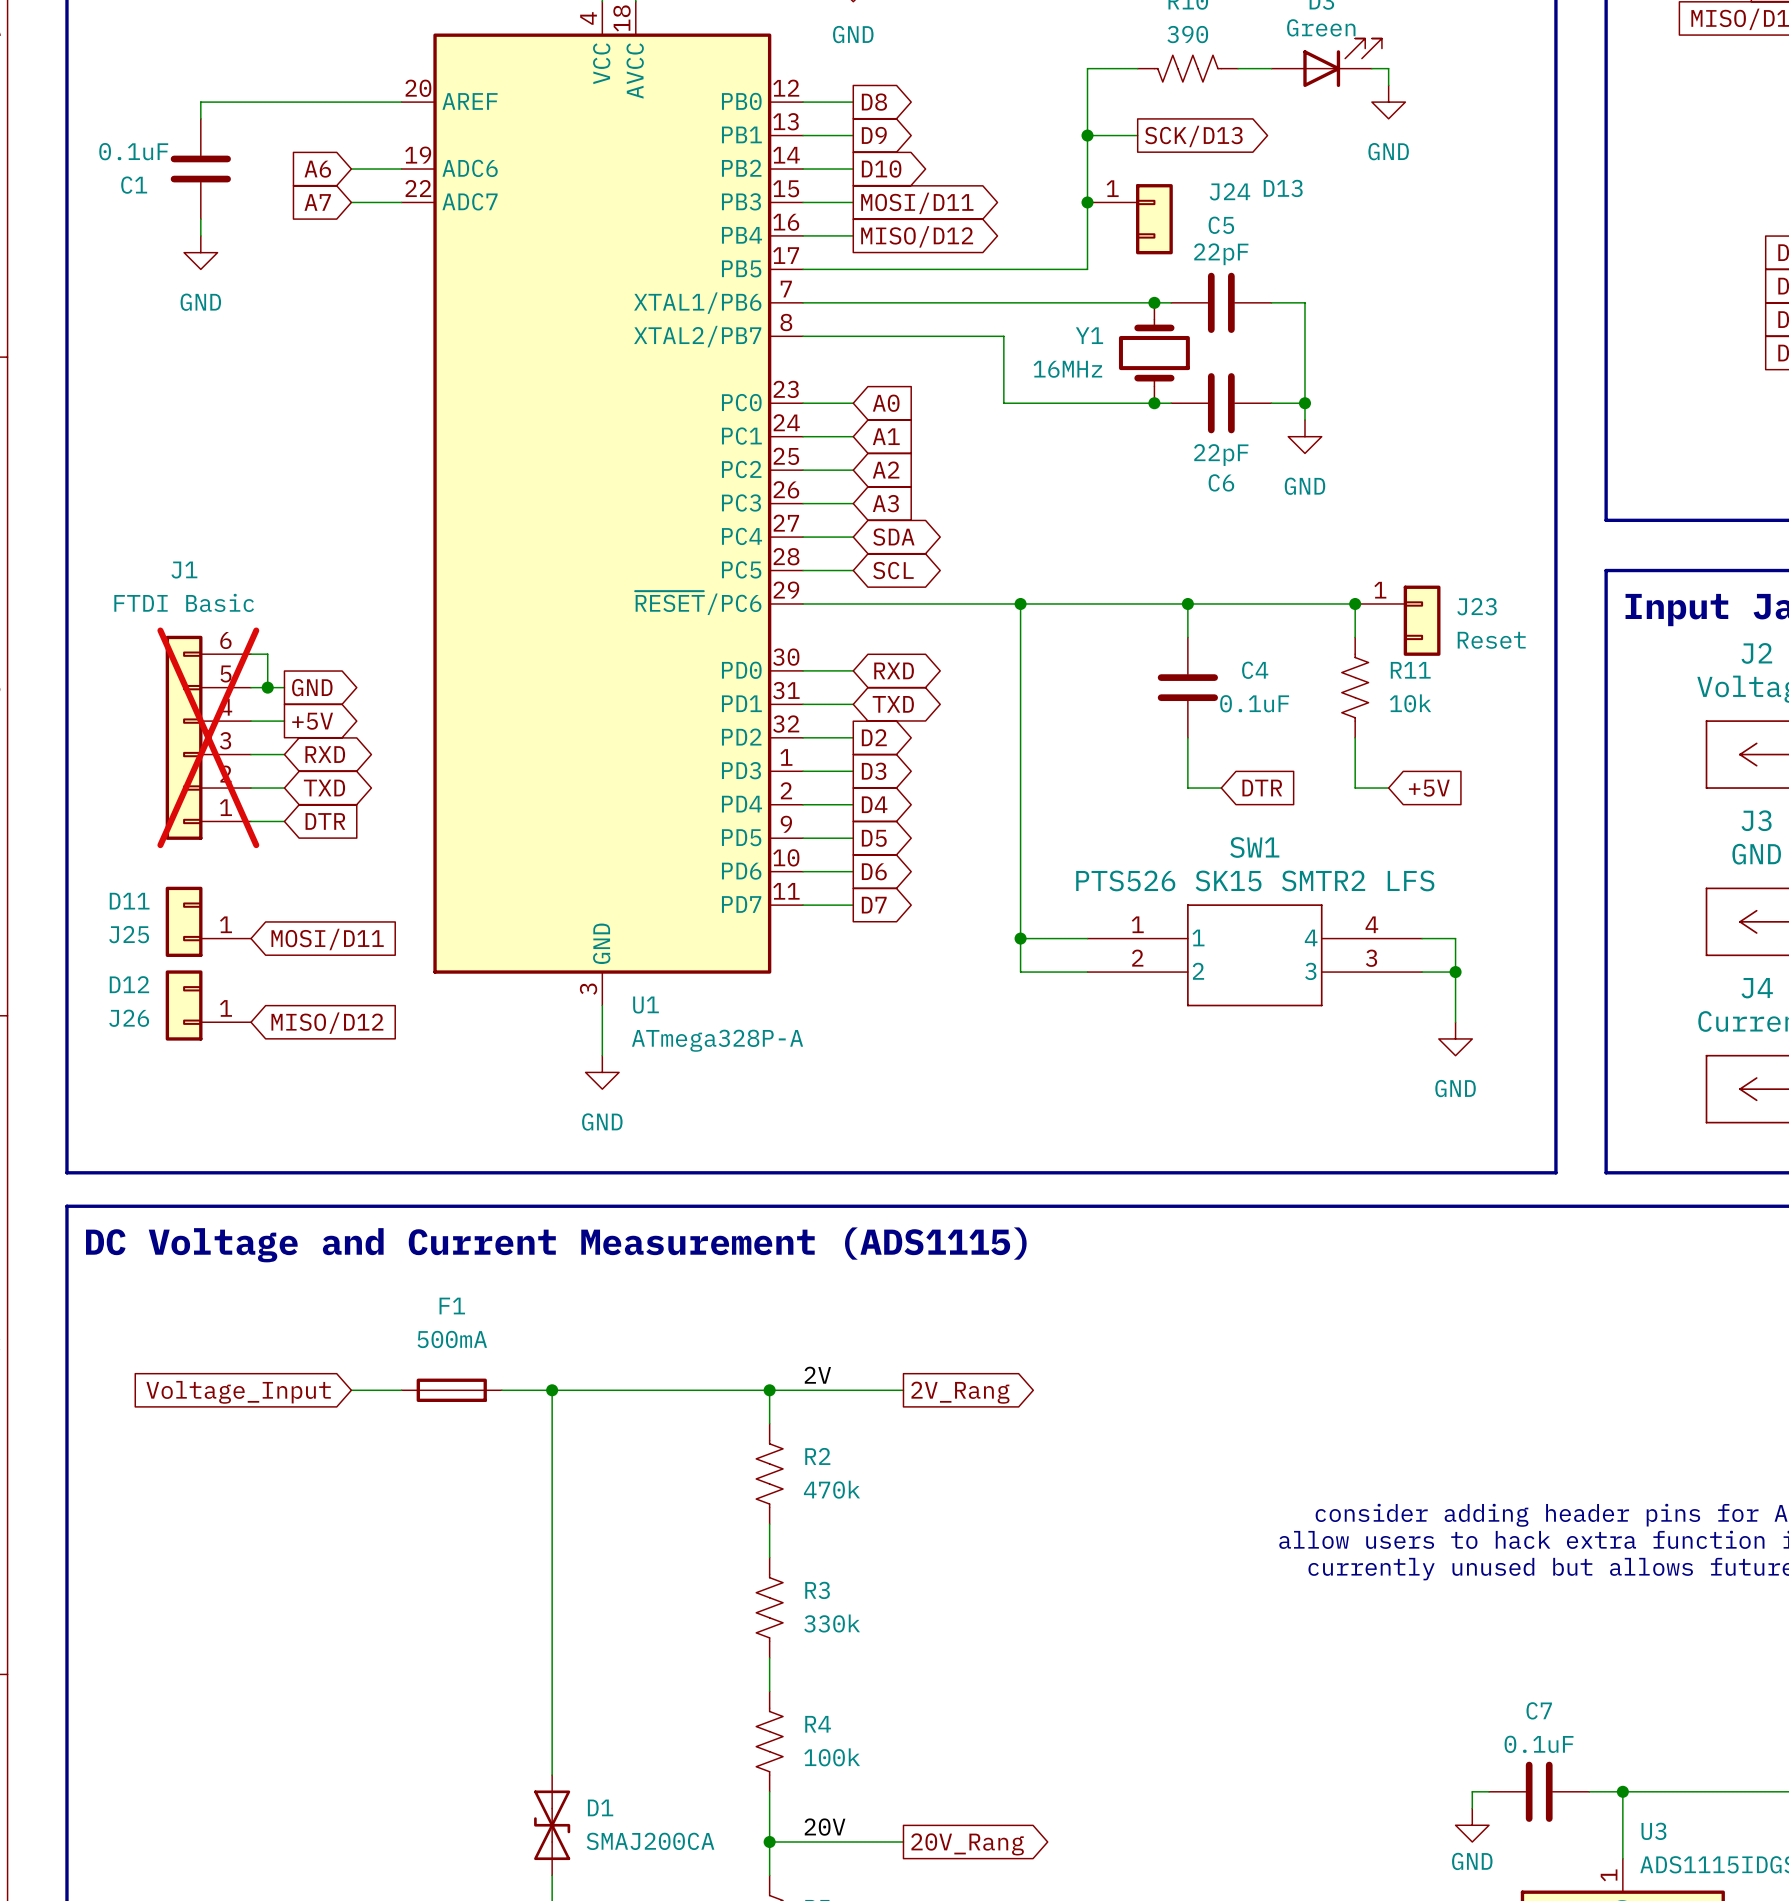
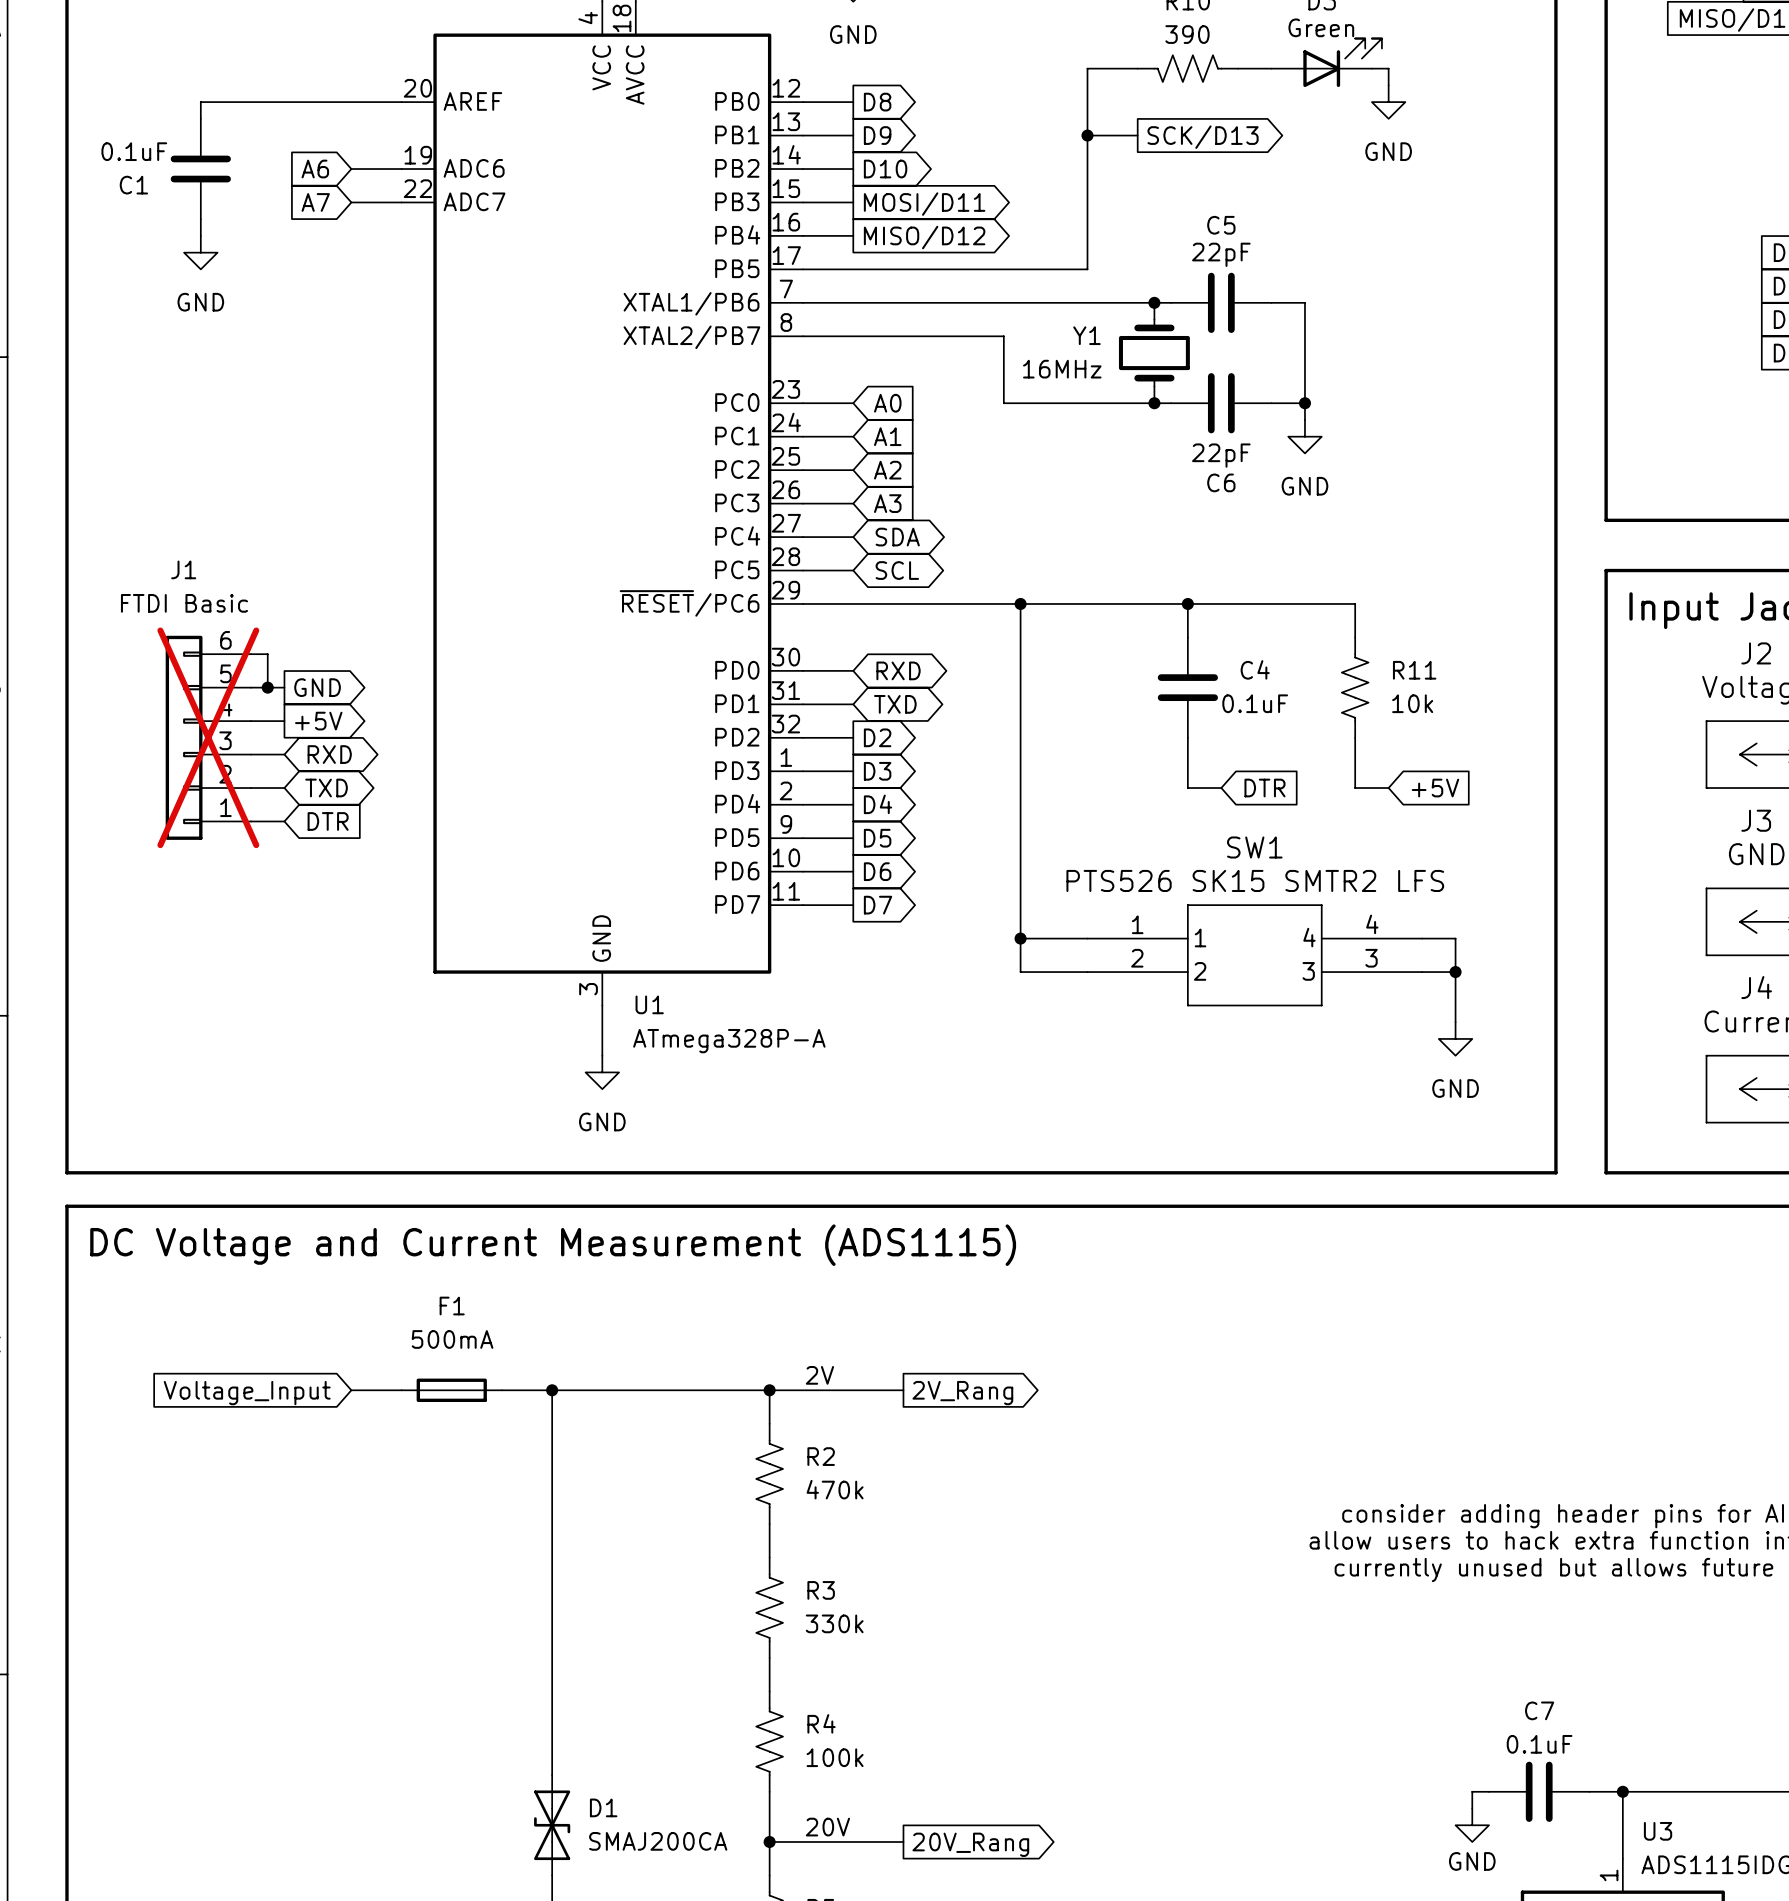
junction: (1087, 202) -> none
J24: D13 (1130, 219) -> none
junction: (1355, 603) -> none
J23: Reset (1397, 620) -> none
J25: D11 (208, 921) -> none
global label: MOSI/D11 (327, 939) -> none
J26: D12 (208, 1005) -> none
global label: MISO/D12 (327, 1023) -> none

